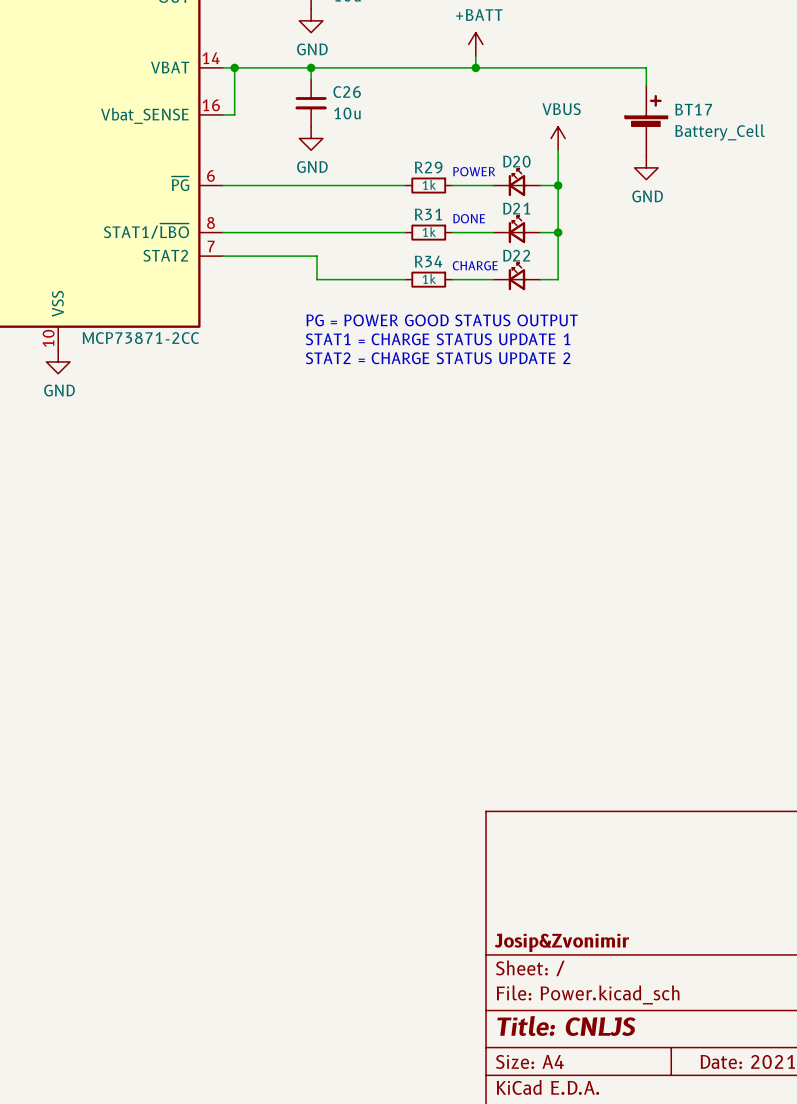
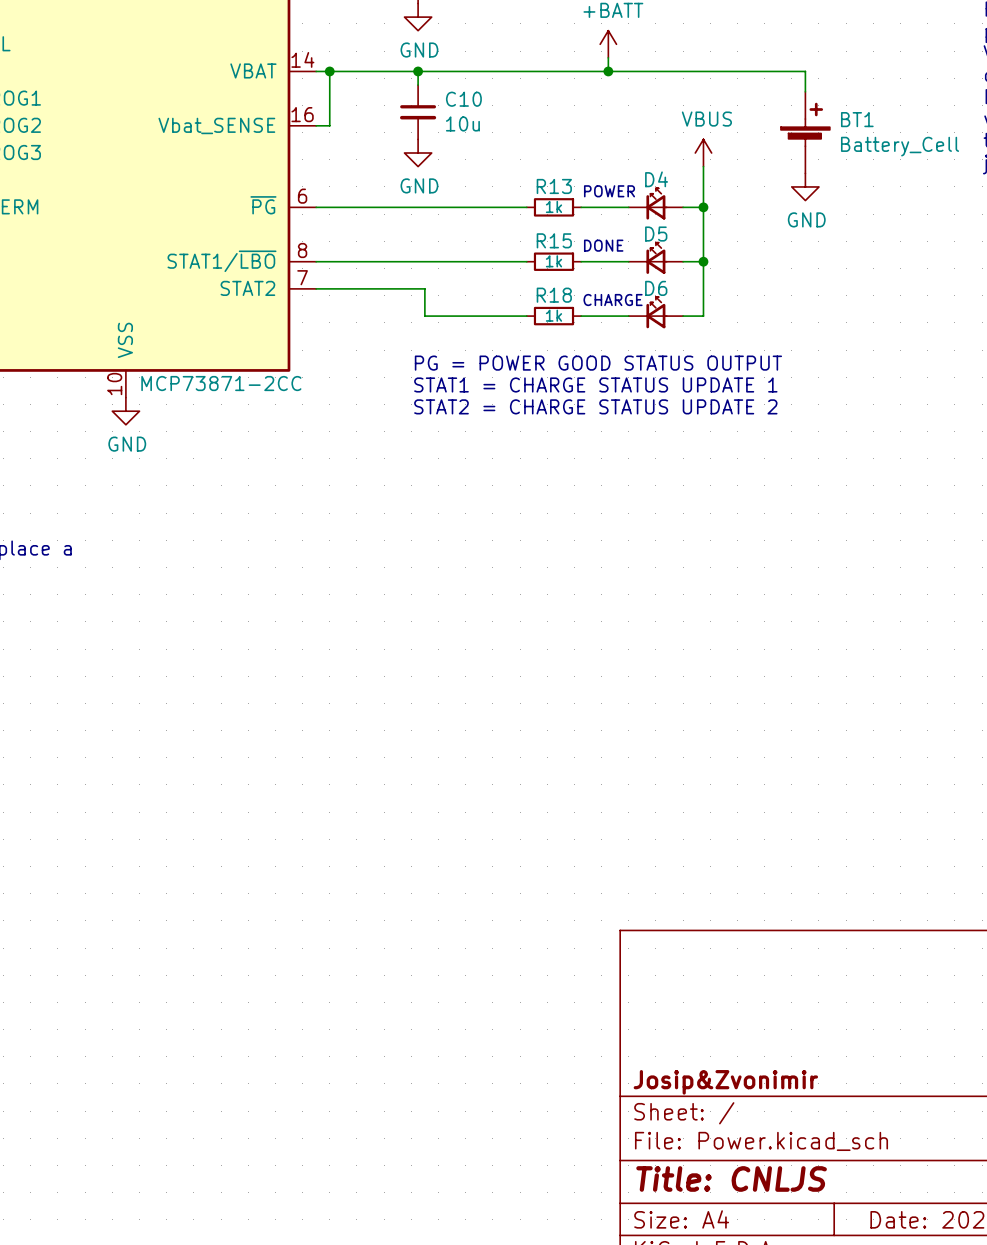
C26 name: C26 (347, 92) -> C10 (463, 99)
BT17 name: BT17 (693, 109) -> BT1 (857, 119)
D20 name: D20 (516, 161) -> D4 (656, 179)
R29 name: R29 (428, 167) -> R13 (554, 186)
D21 name: D21 (516, 208) -> D5 (656, 234)
R31 name: R31 (428, 214) -> R15 (554, 240)
D22 name: D22 (516, 255) -> D6 (656, 288)
R34 name: R34 (428, 261) -> R18 (554, 295)

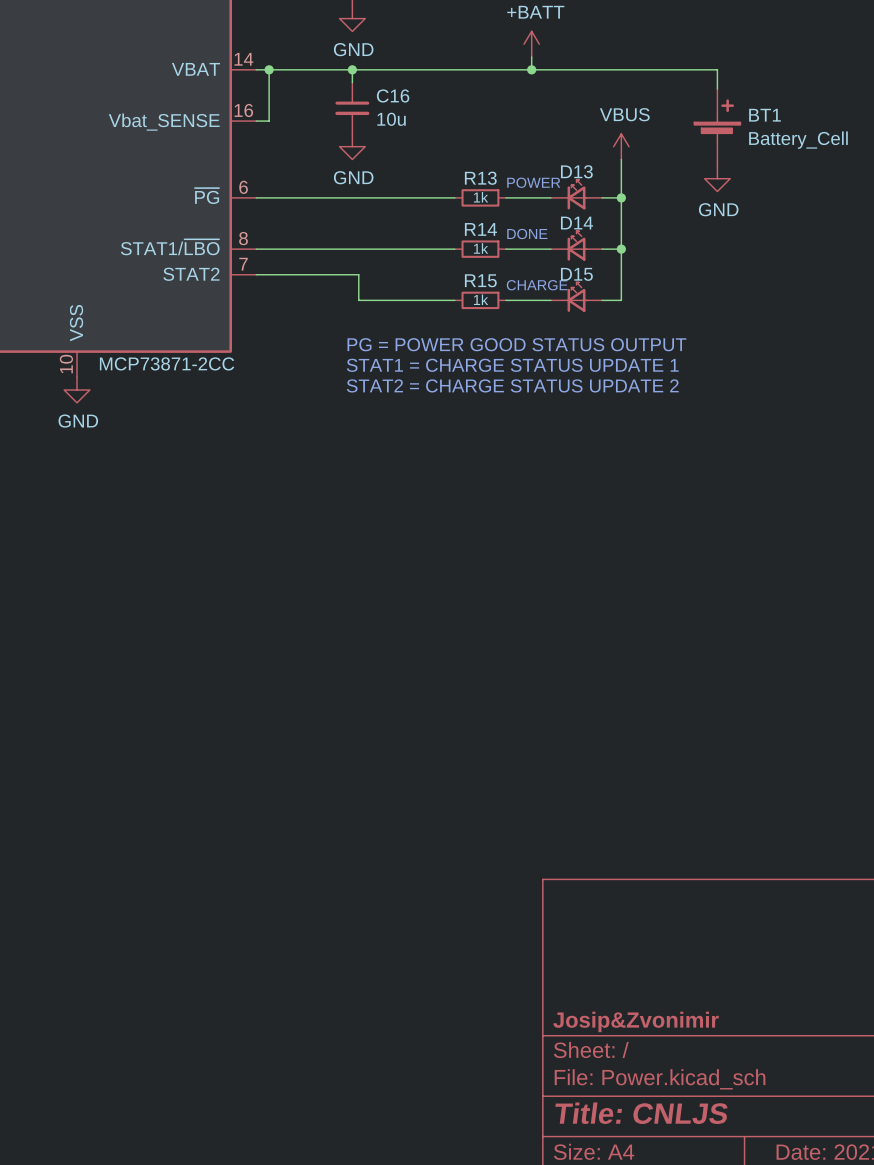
C10 name: C10 (463, 99) -> C16 (393, 95)
D4 name: D4 (656, 179) -> D13 (576, 171)
D5 name: D5 (656, 234) -> D14 (577, 223)
R15 name: R15 (554, 240) -> R14 (480, 229)
D6 name: D6 (656, 288) -> D15 (576, 274)
R18 name: R18 (554, 295) -> R15 (480, 280)

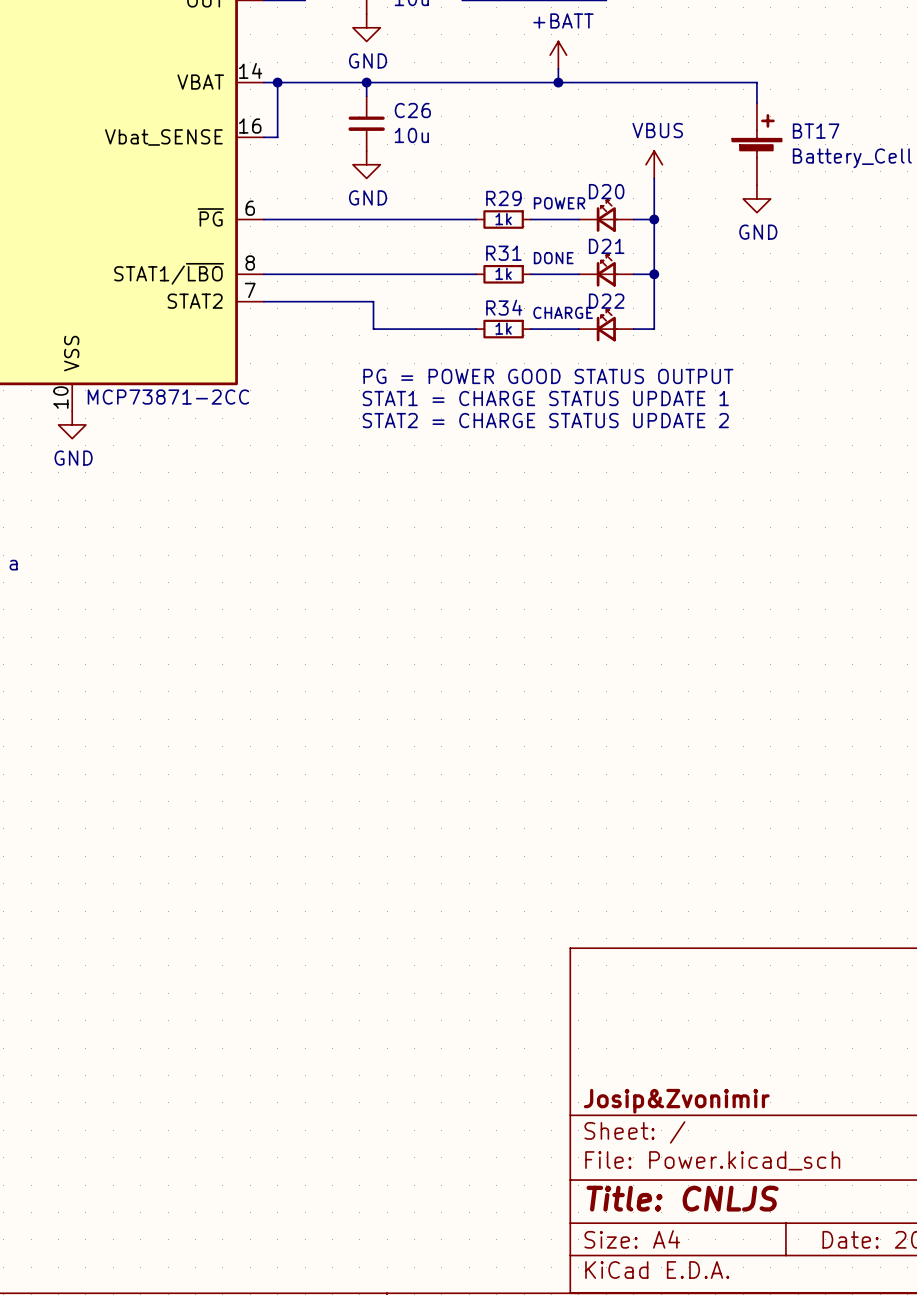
C16 name: C16 (393, 95) -> C26 (412, 110)
BT1 name: BT1 (765, 115) -> BT17 (816, 131)
D13 name: D13 (576, 171) -> D20 (606, 191)
R13 name: R13 (480, 178) -> R29 (503, 198)
D14 name: D14 (577, 223) -> D21 (606, 246)
R14 name: R14 (480, 229) -> R31 (503, 253)
D15 name: D15 (576, 274) -> D22 (606, 301)
R15 name: R15 (480, 280) -> R34 (504, 307)

